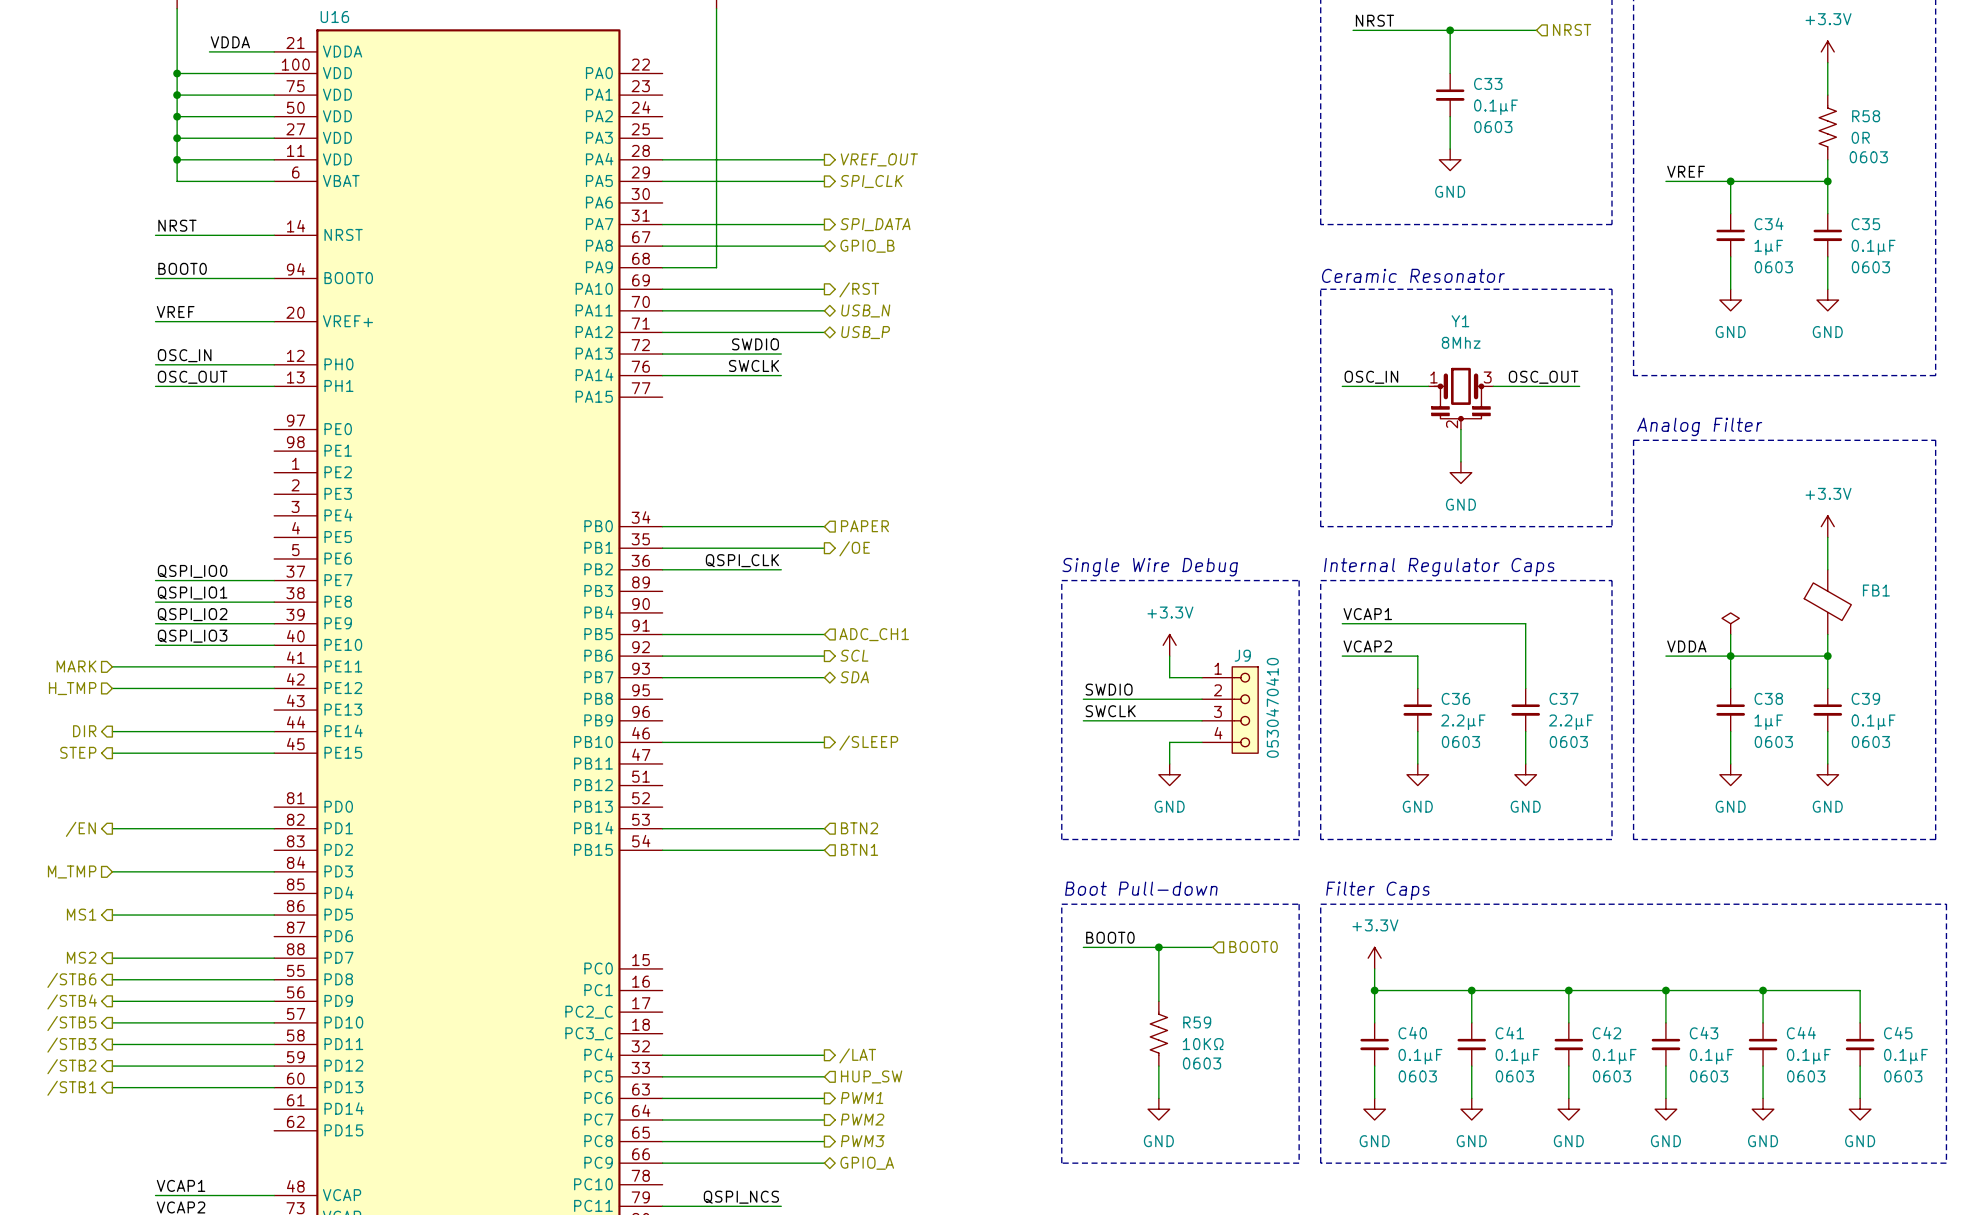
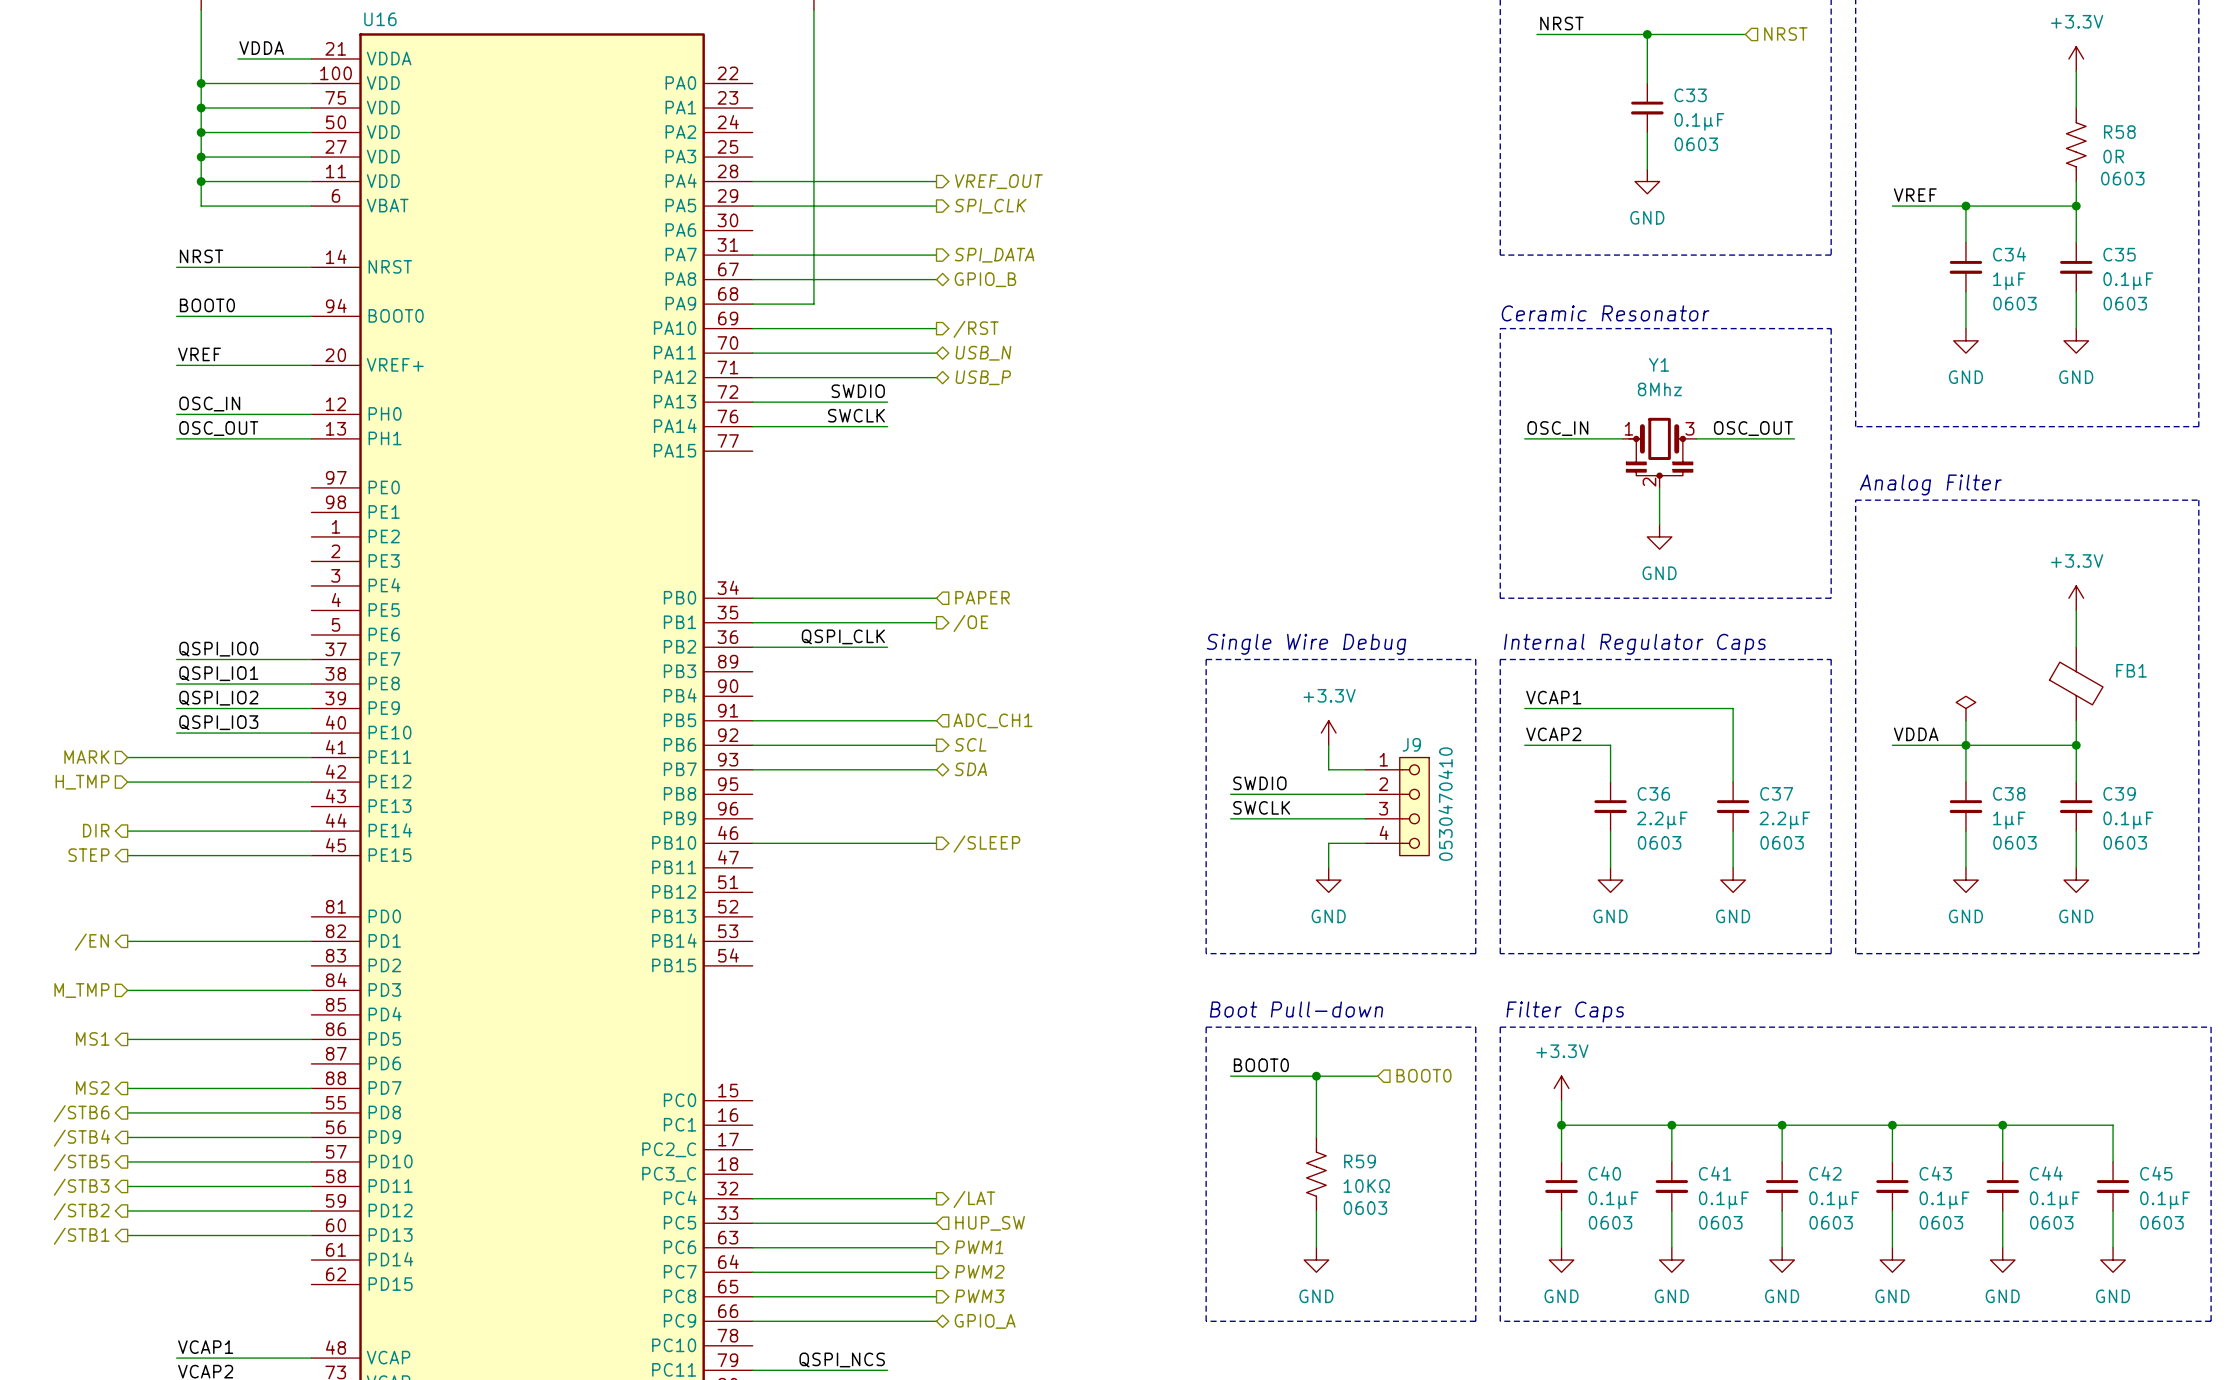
wire: (662, 828) (824, 828) -> none
hierarchical label: BTN2 (859, 828) -> none
hierarchical label: BTN1 (859, 849) -> none
wire: (662, 850) (824, 850) -> none

